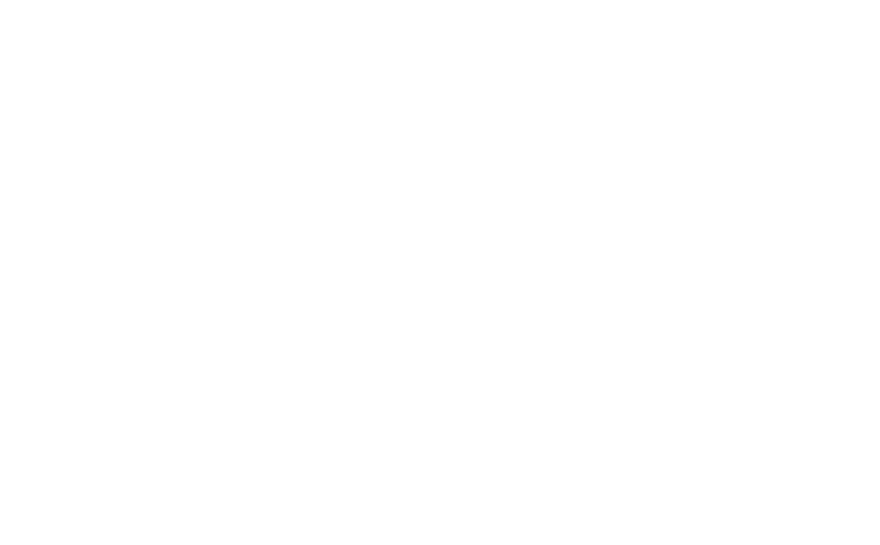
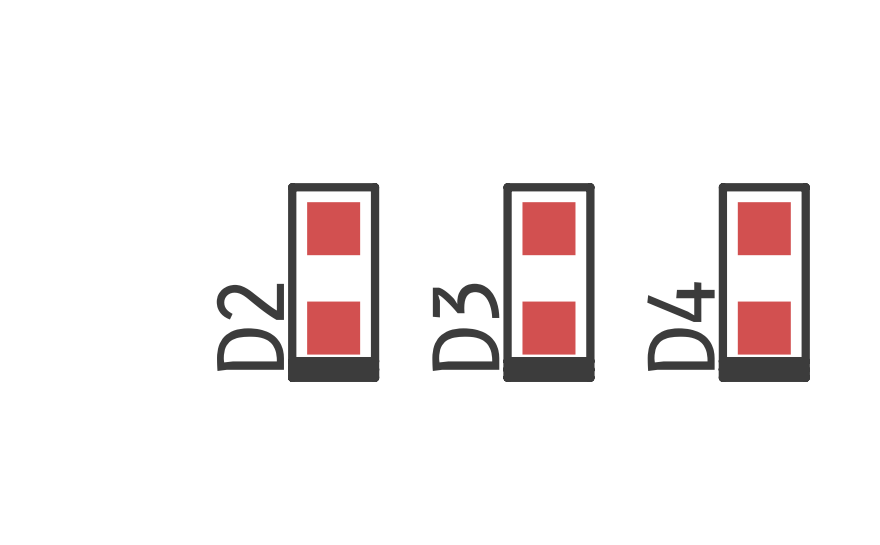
D2: none -> (333, 282)
D3: none -> (548, 282)
D4: none -> (764, 282)

